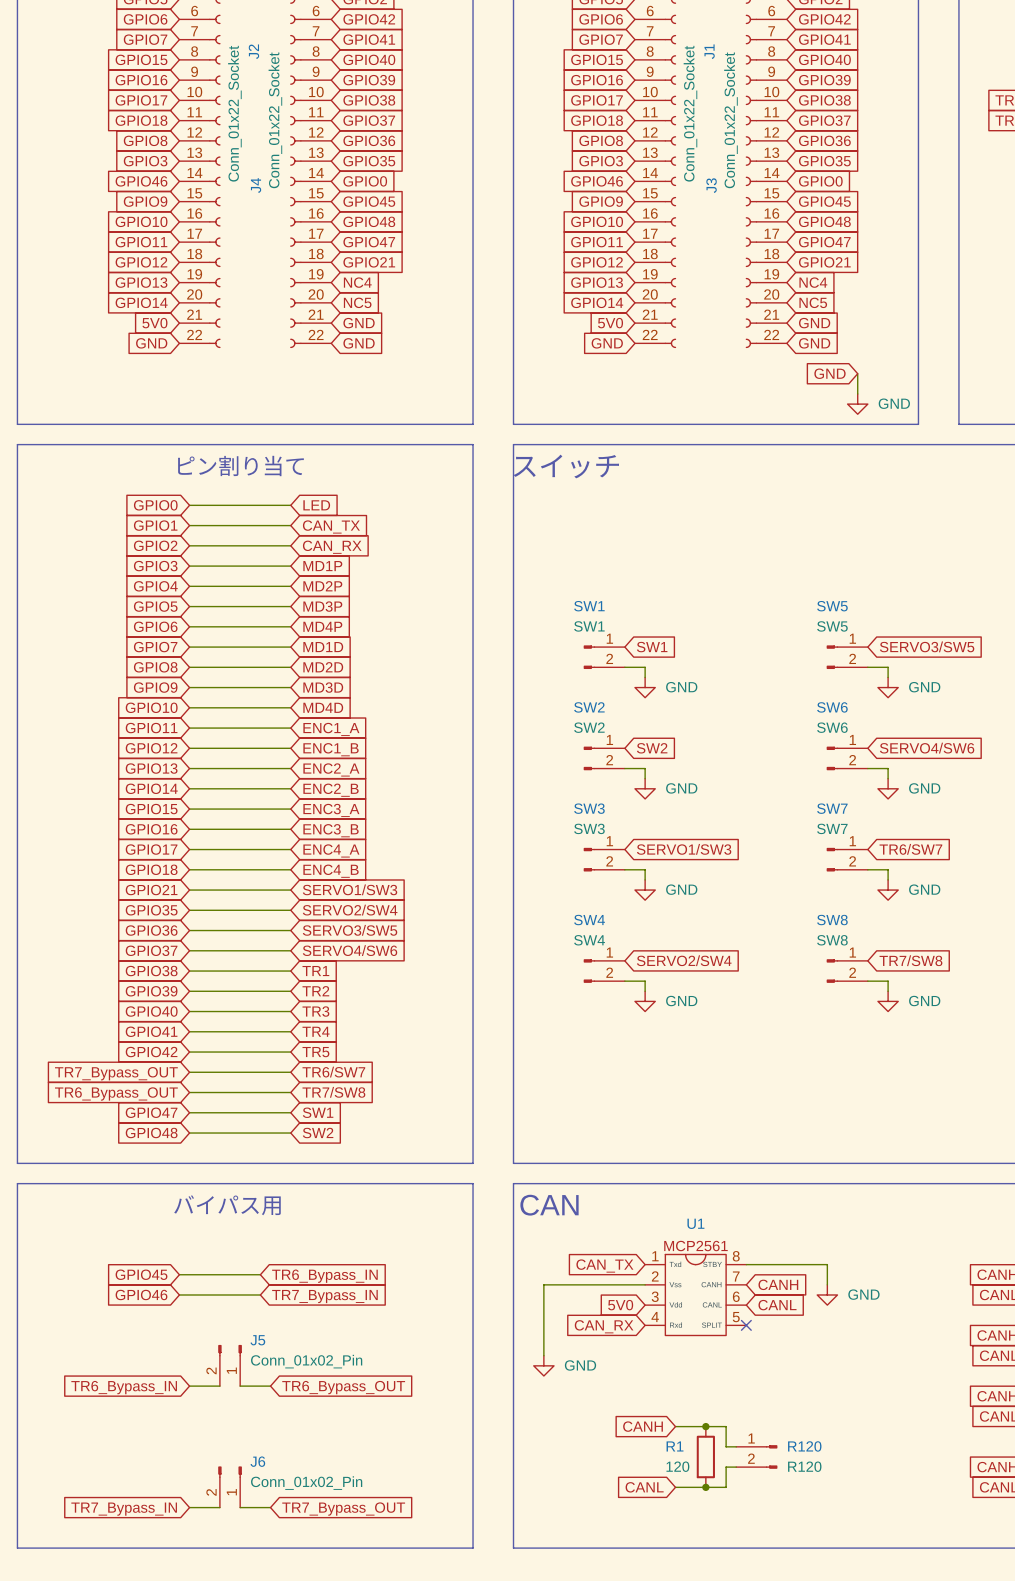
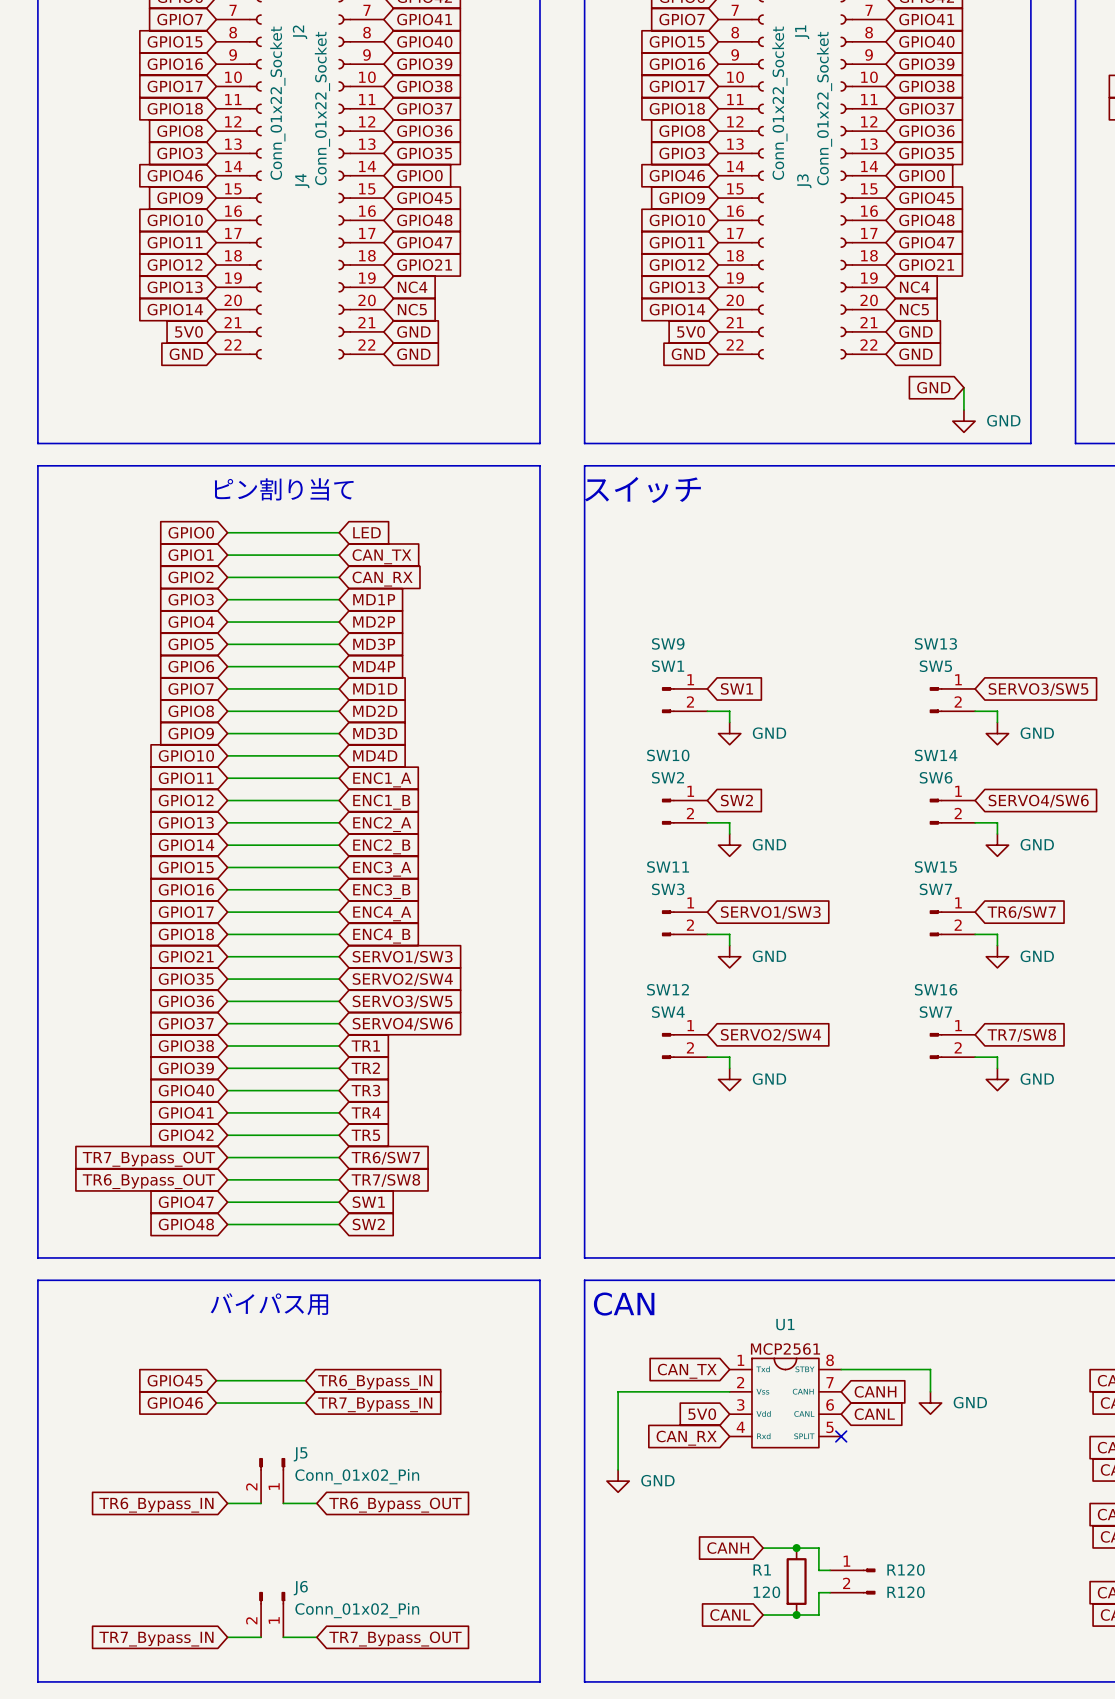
SW1 name: SW1 (589, 606) -> SW9 (668, 643)
SW5 name: SW5 (832, 606) -> SW13 (935, 643)
SW2 name: SW2 (589, 707) -> SW10 (668, 755)
SW6 name: SW6 (832, 707) -> SW14 (936, 755)
SW3 name: SW3 (589, 808) -> SW11 (668, 867)
SW7 name: SW7 (832, 808) -> SW15 (935, 867)
SW4 name: SW4 (589, 920) -> SW12 (668, 989)
SW8 name: SW8 (832, 920) -> SW16 (936, 989)
SW8 value: SW8 (832, 940) -> SW7 (935, 1012)

